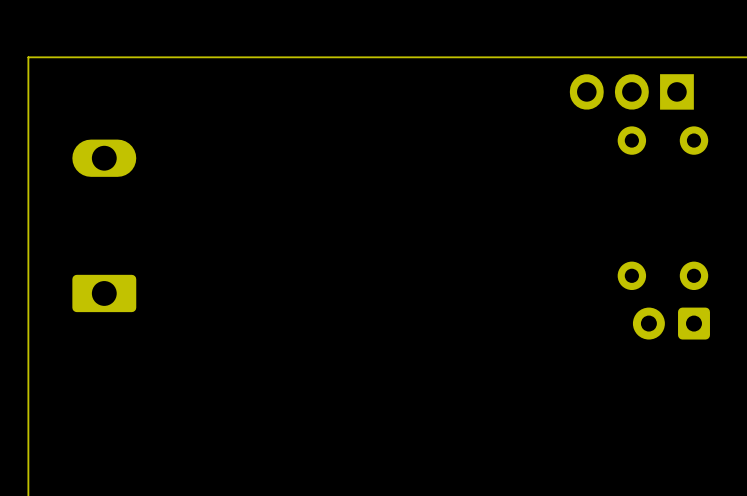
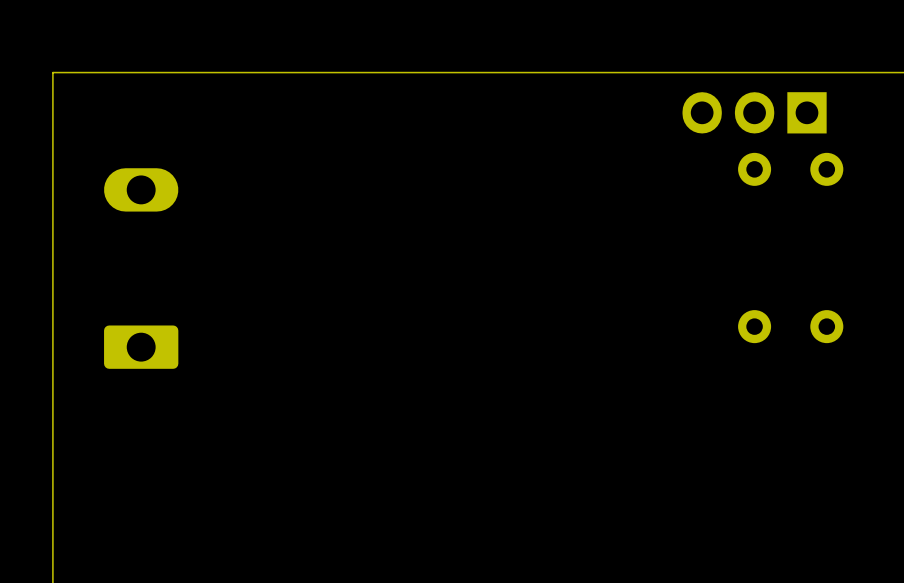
part: (671, 323) -> none

